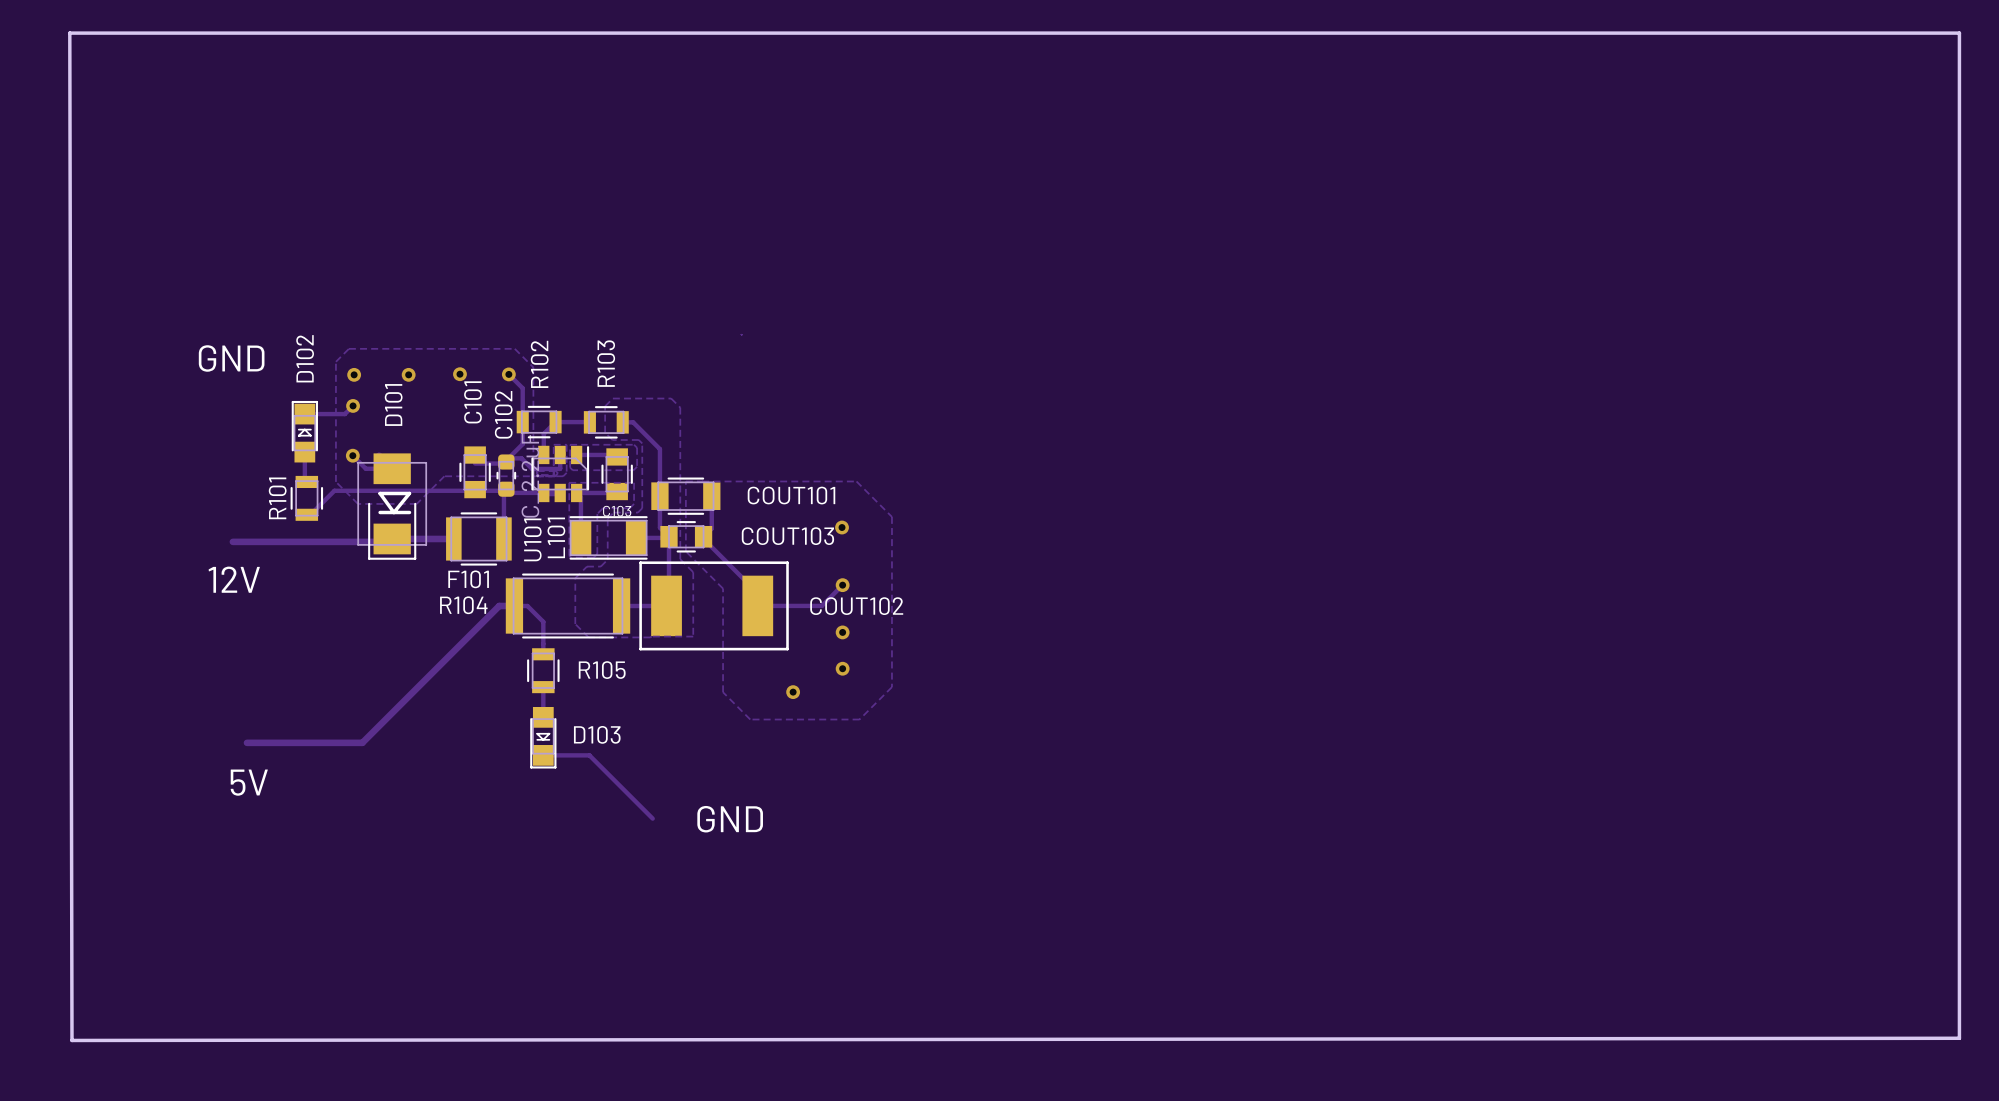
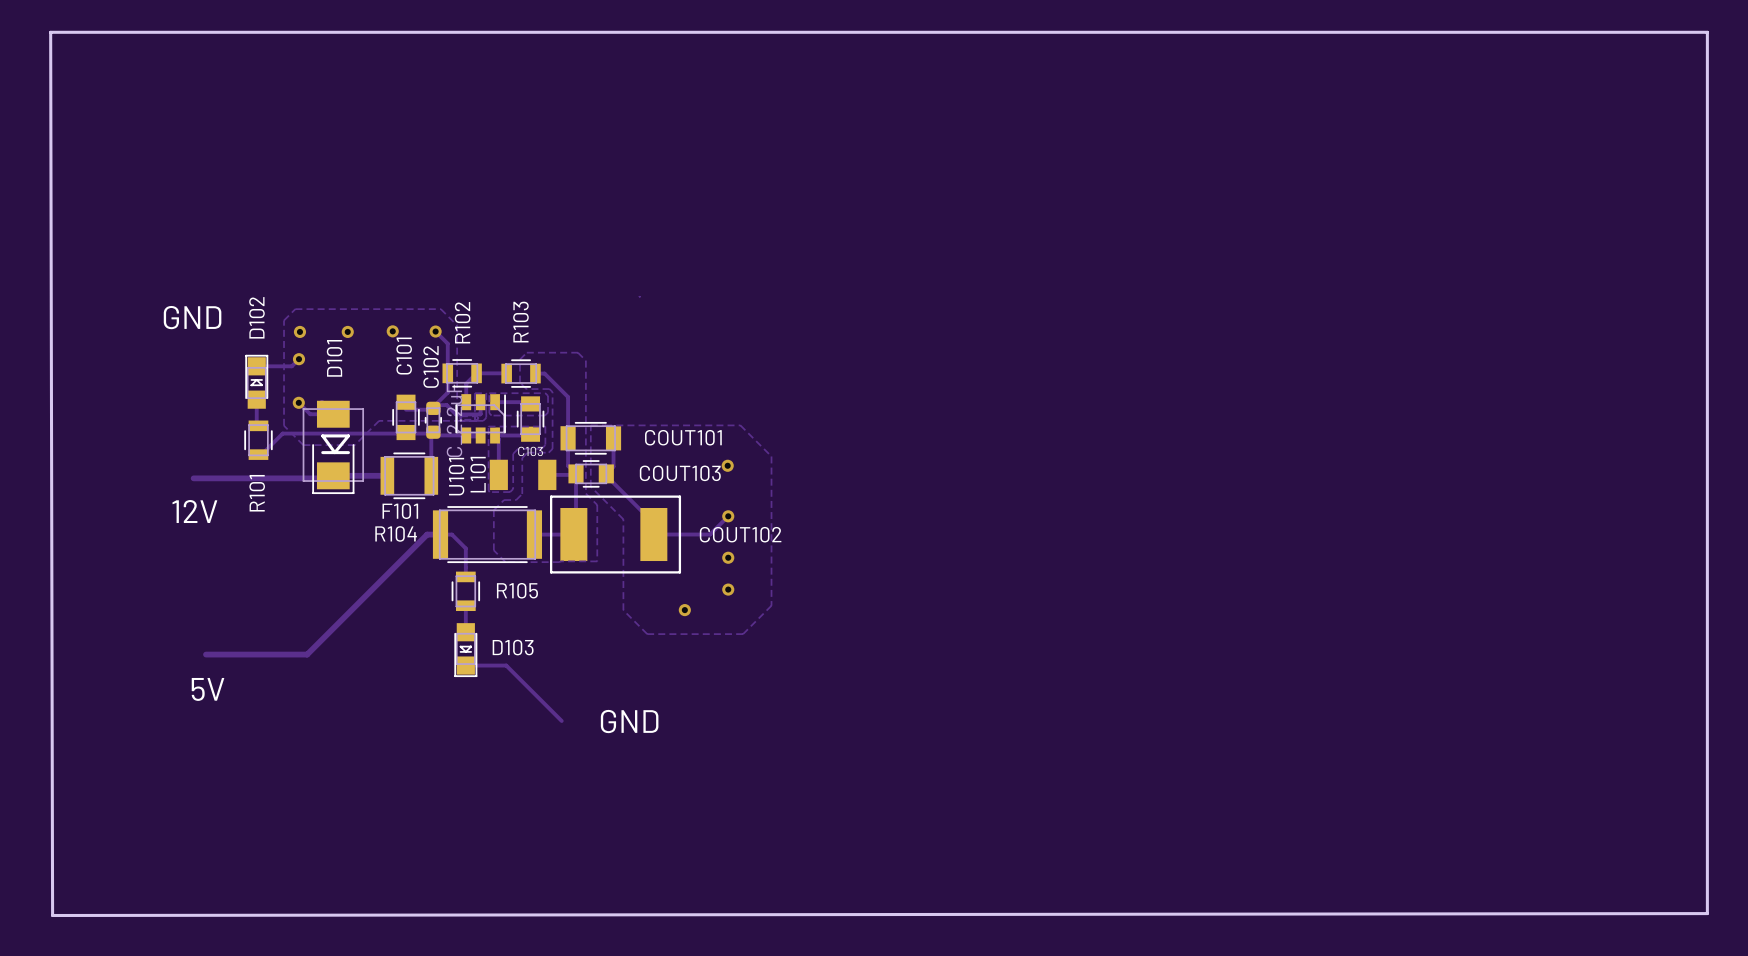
R101 name position: R101 (277, 498) -> R101 (257, 493)
L101 footprint: [569, 516, 648, 560] -> [489, 459, 557, 491]

